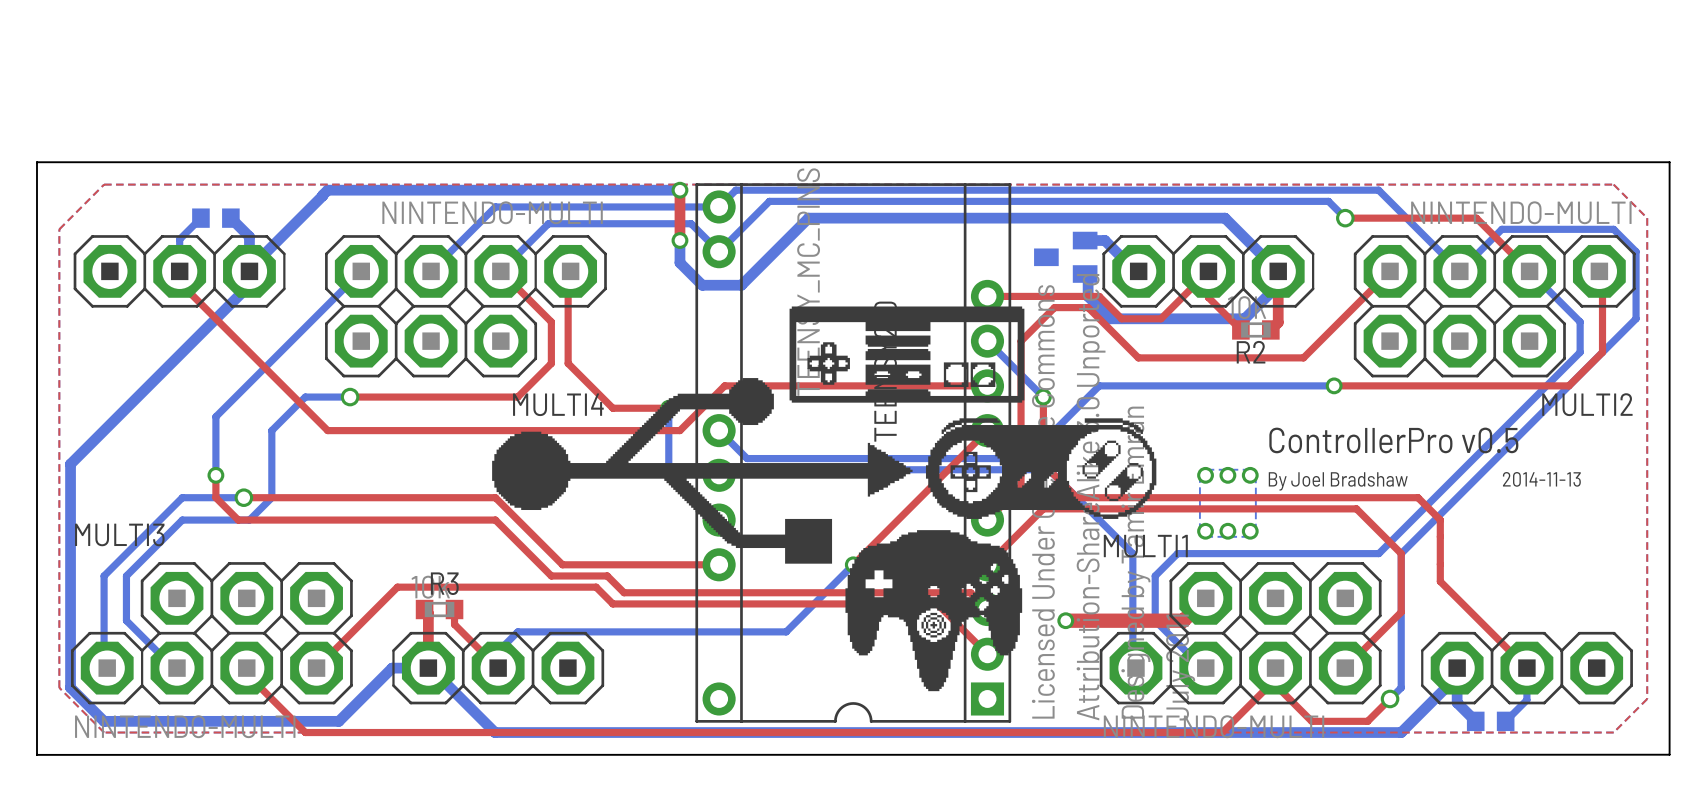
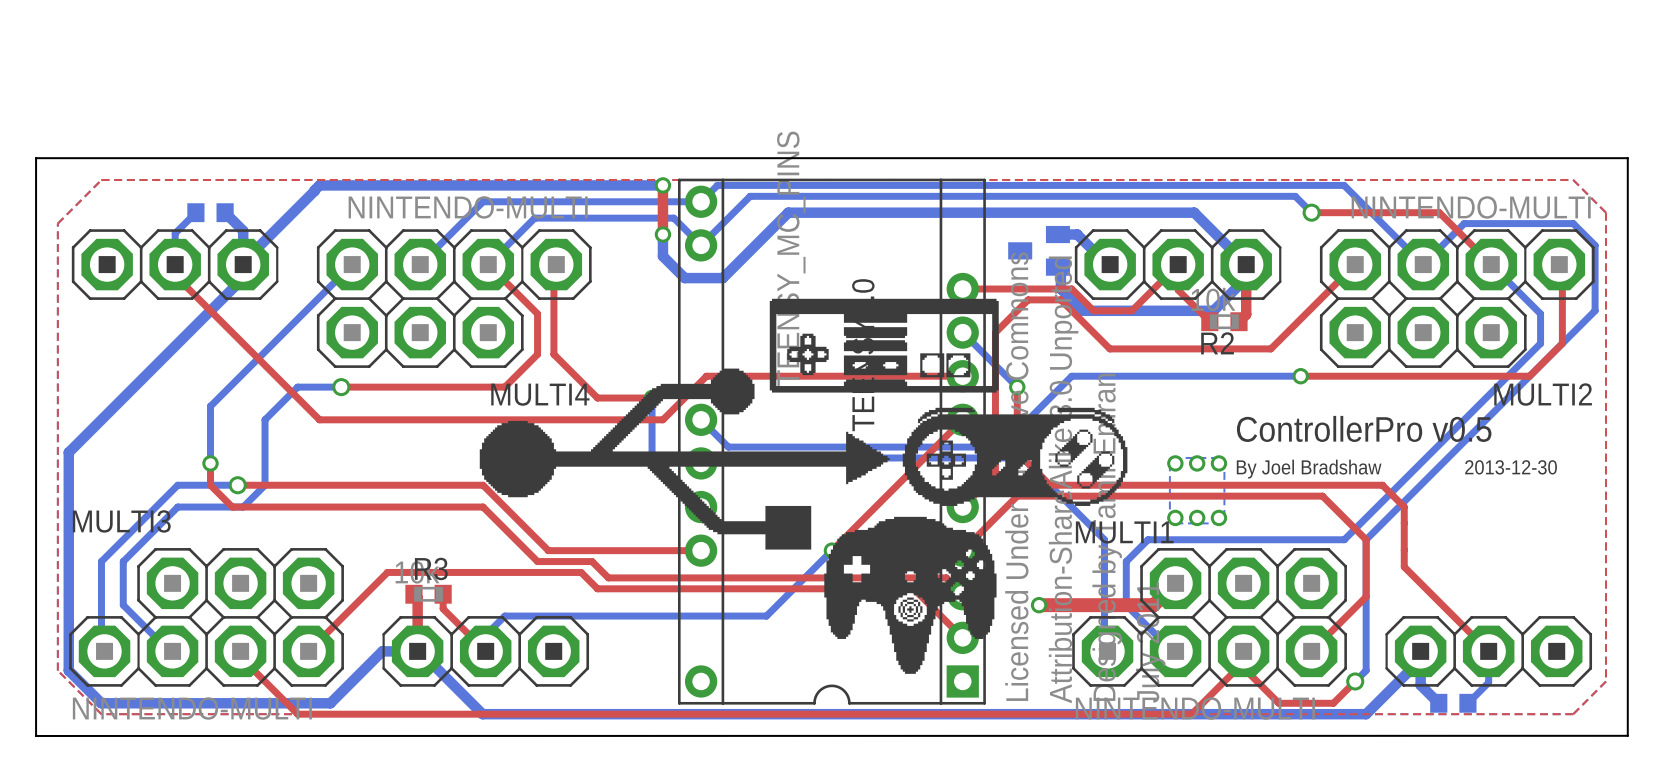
text: 2014-11-13 (1541, 479) -> 2013-12-30 (1511, 467)

